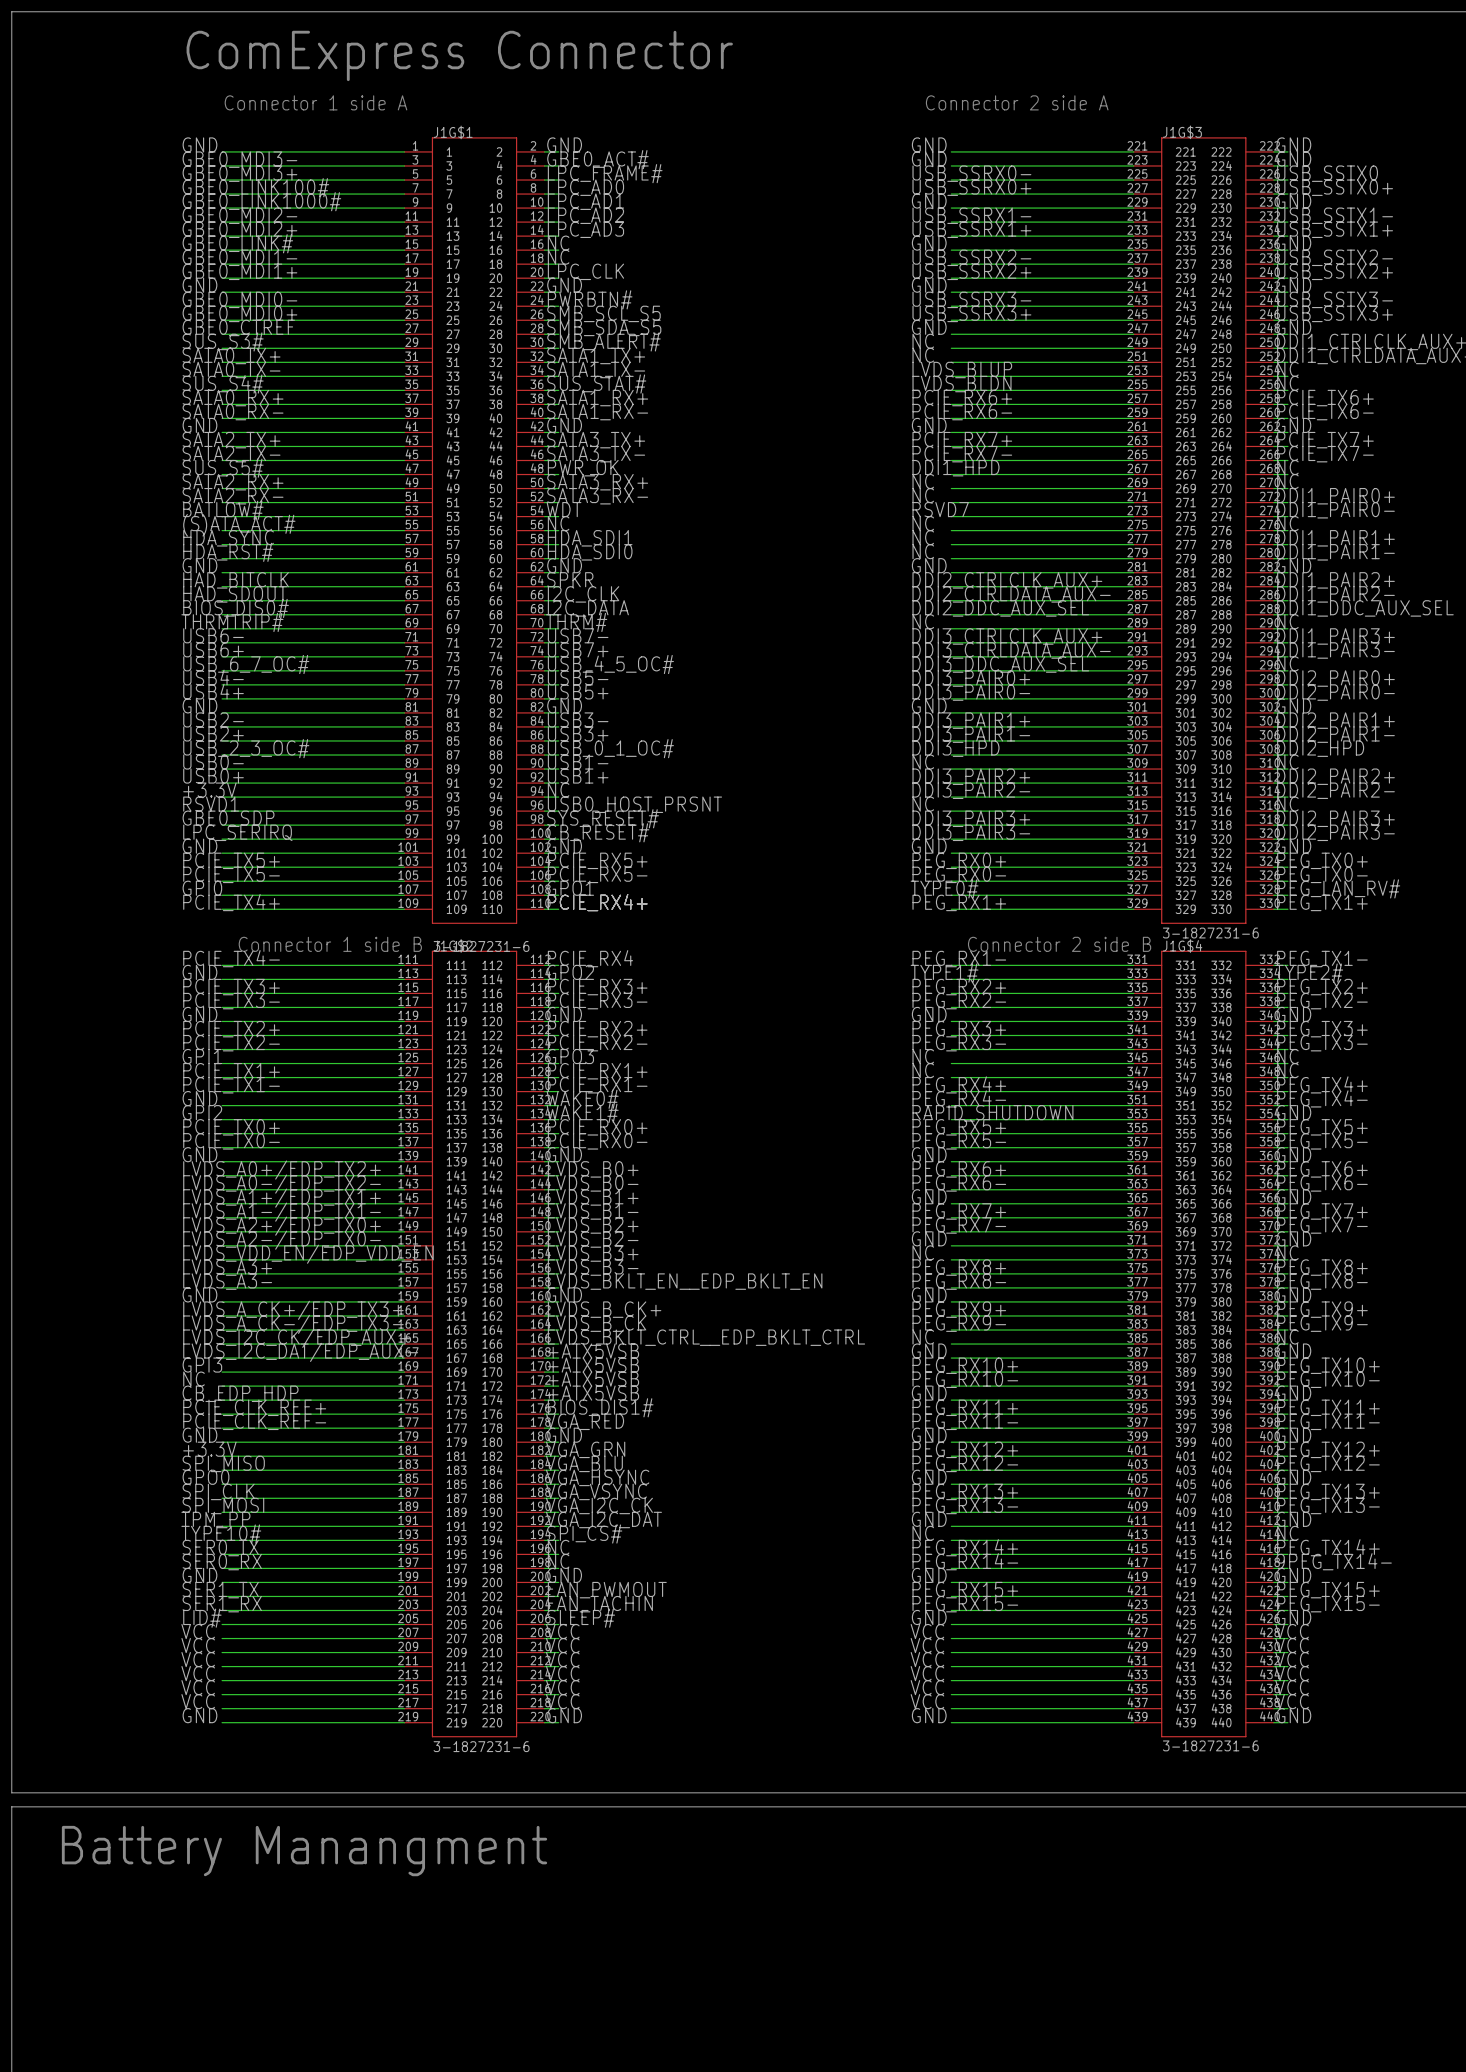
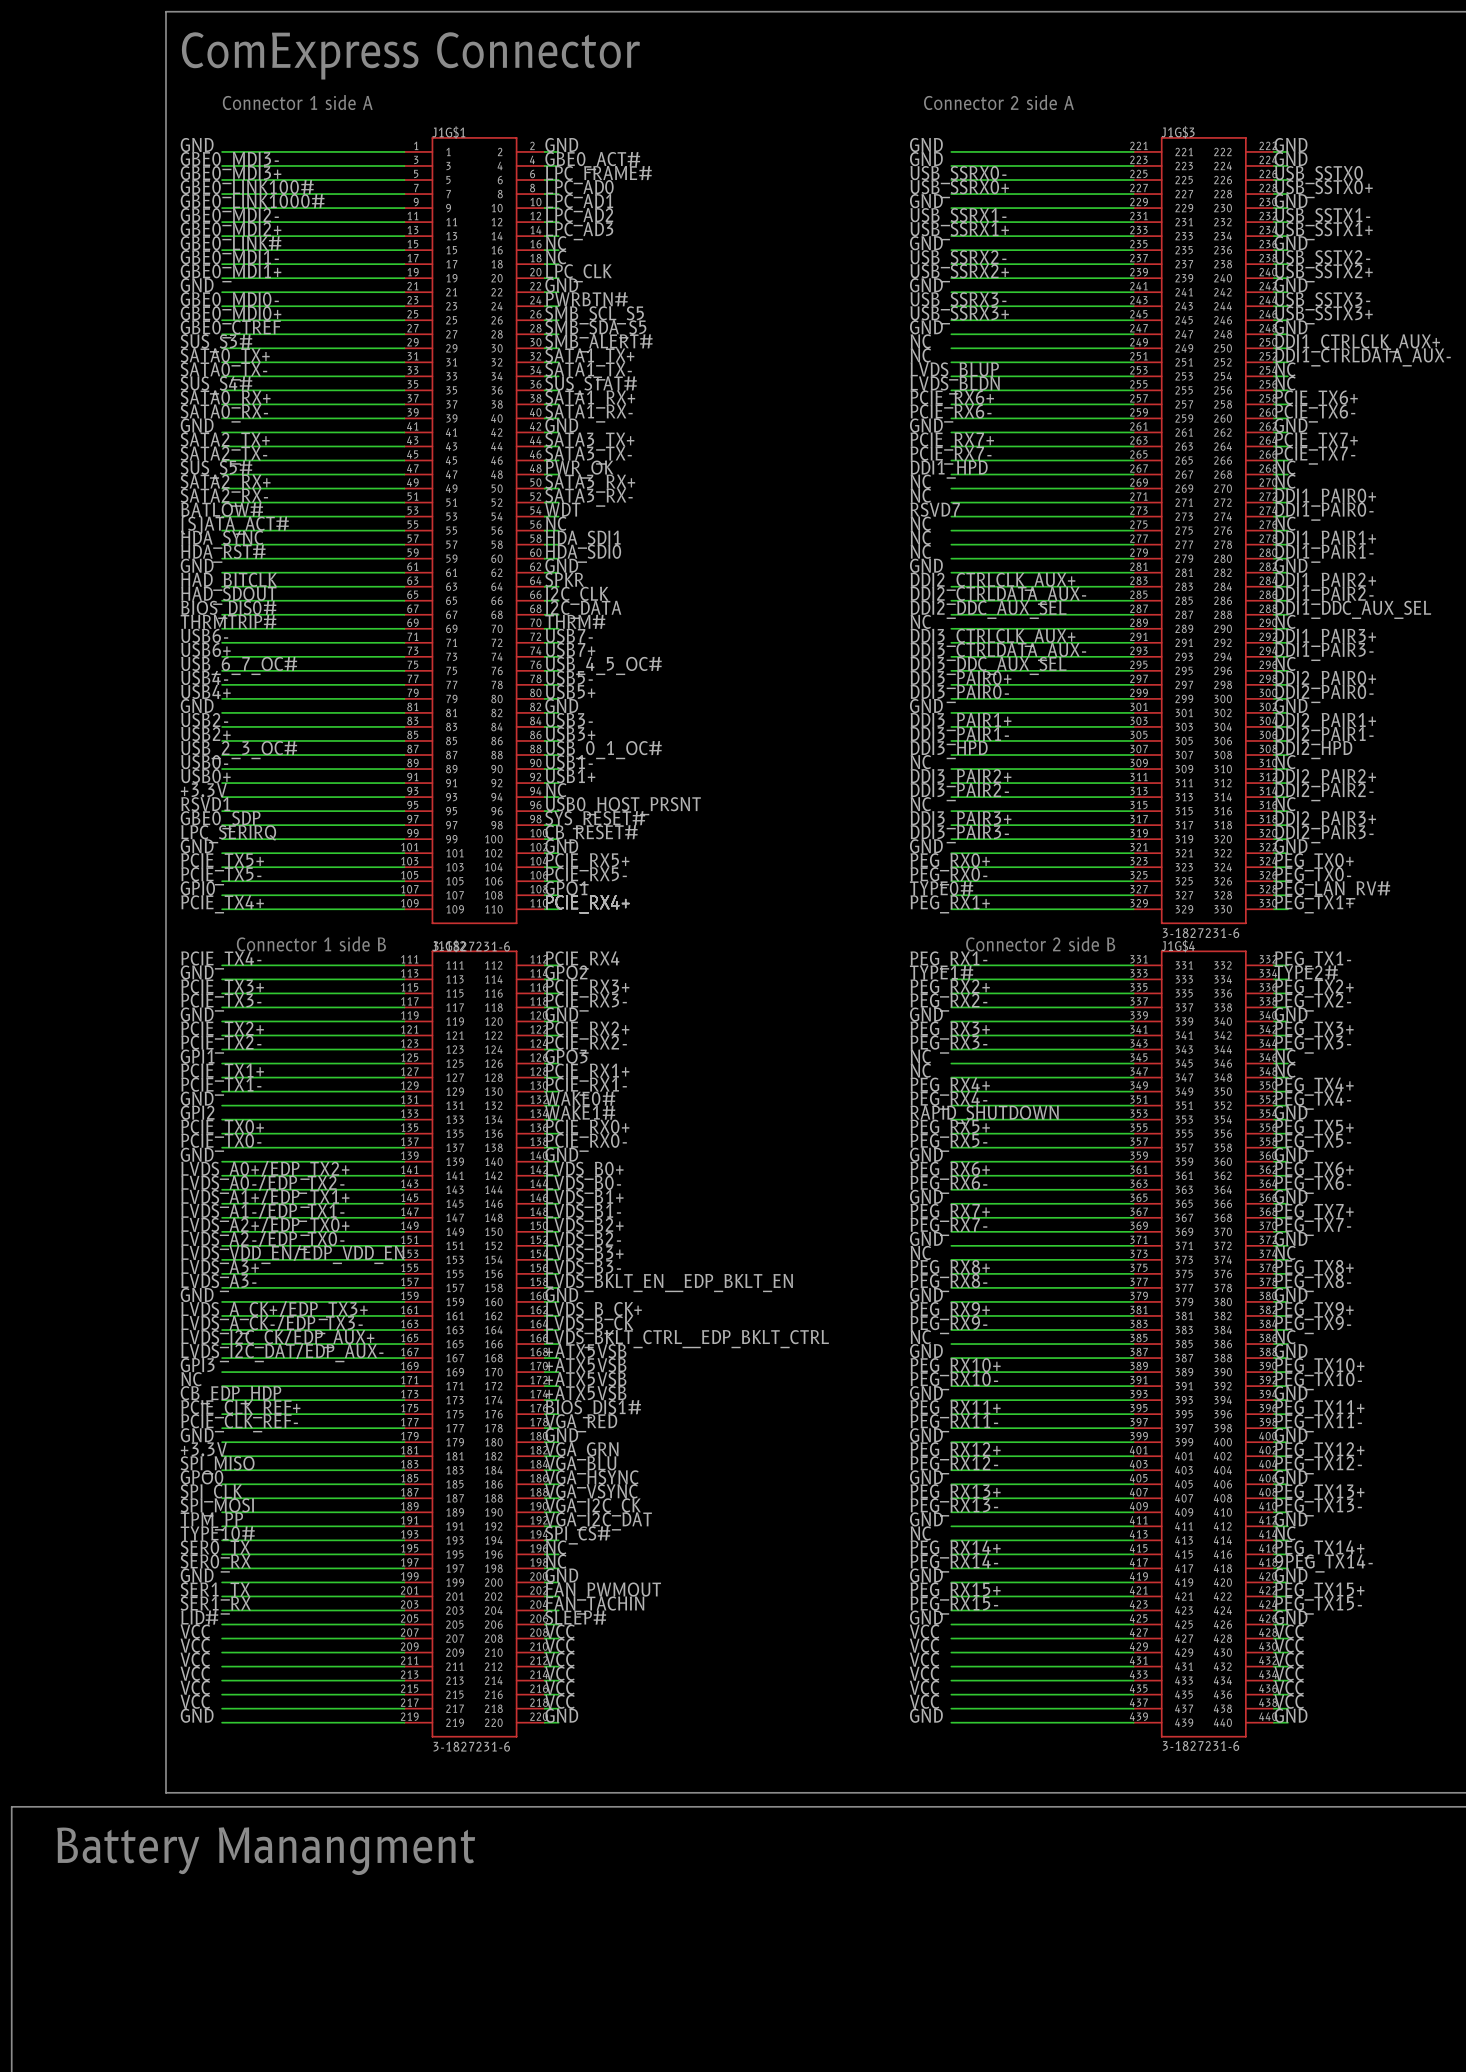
line: (165, 11) (11, 11) (11, 1792) (165, 1792) -> (165, 11) (165, 1792)

